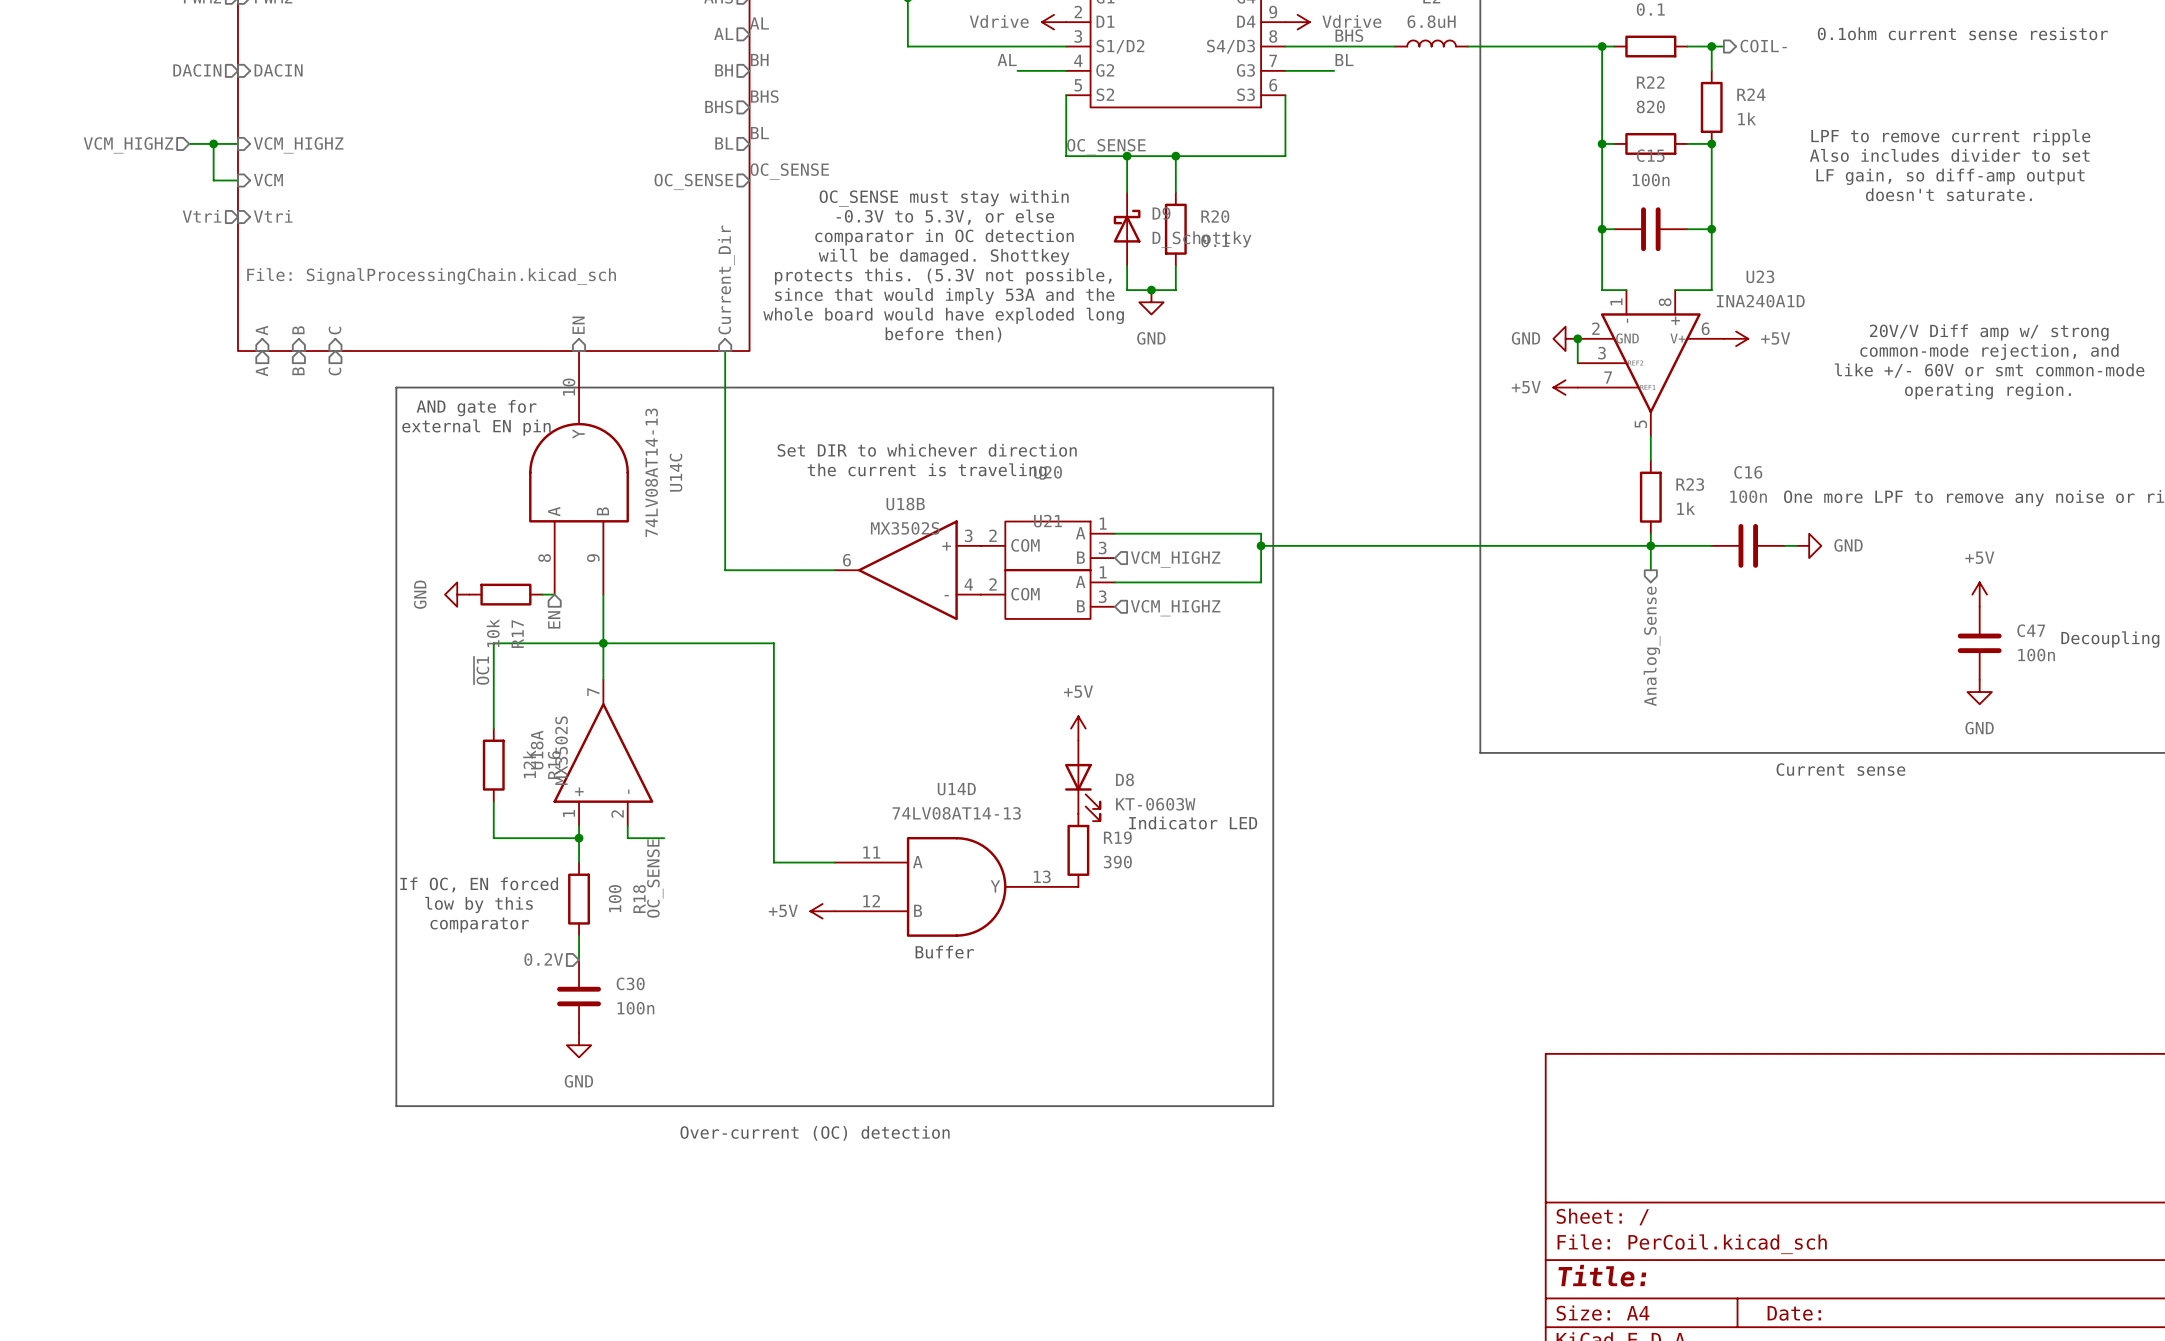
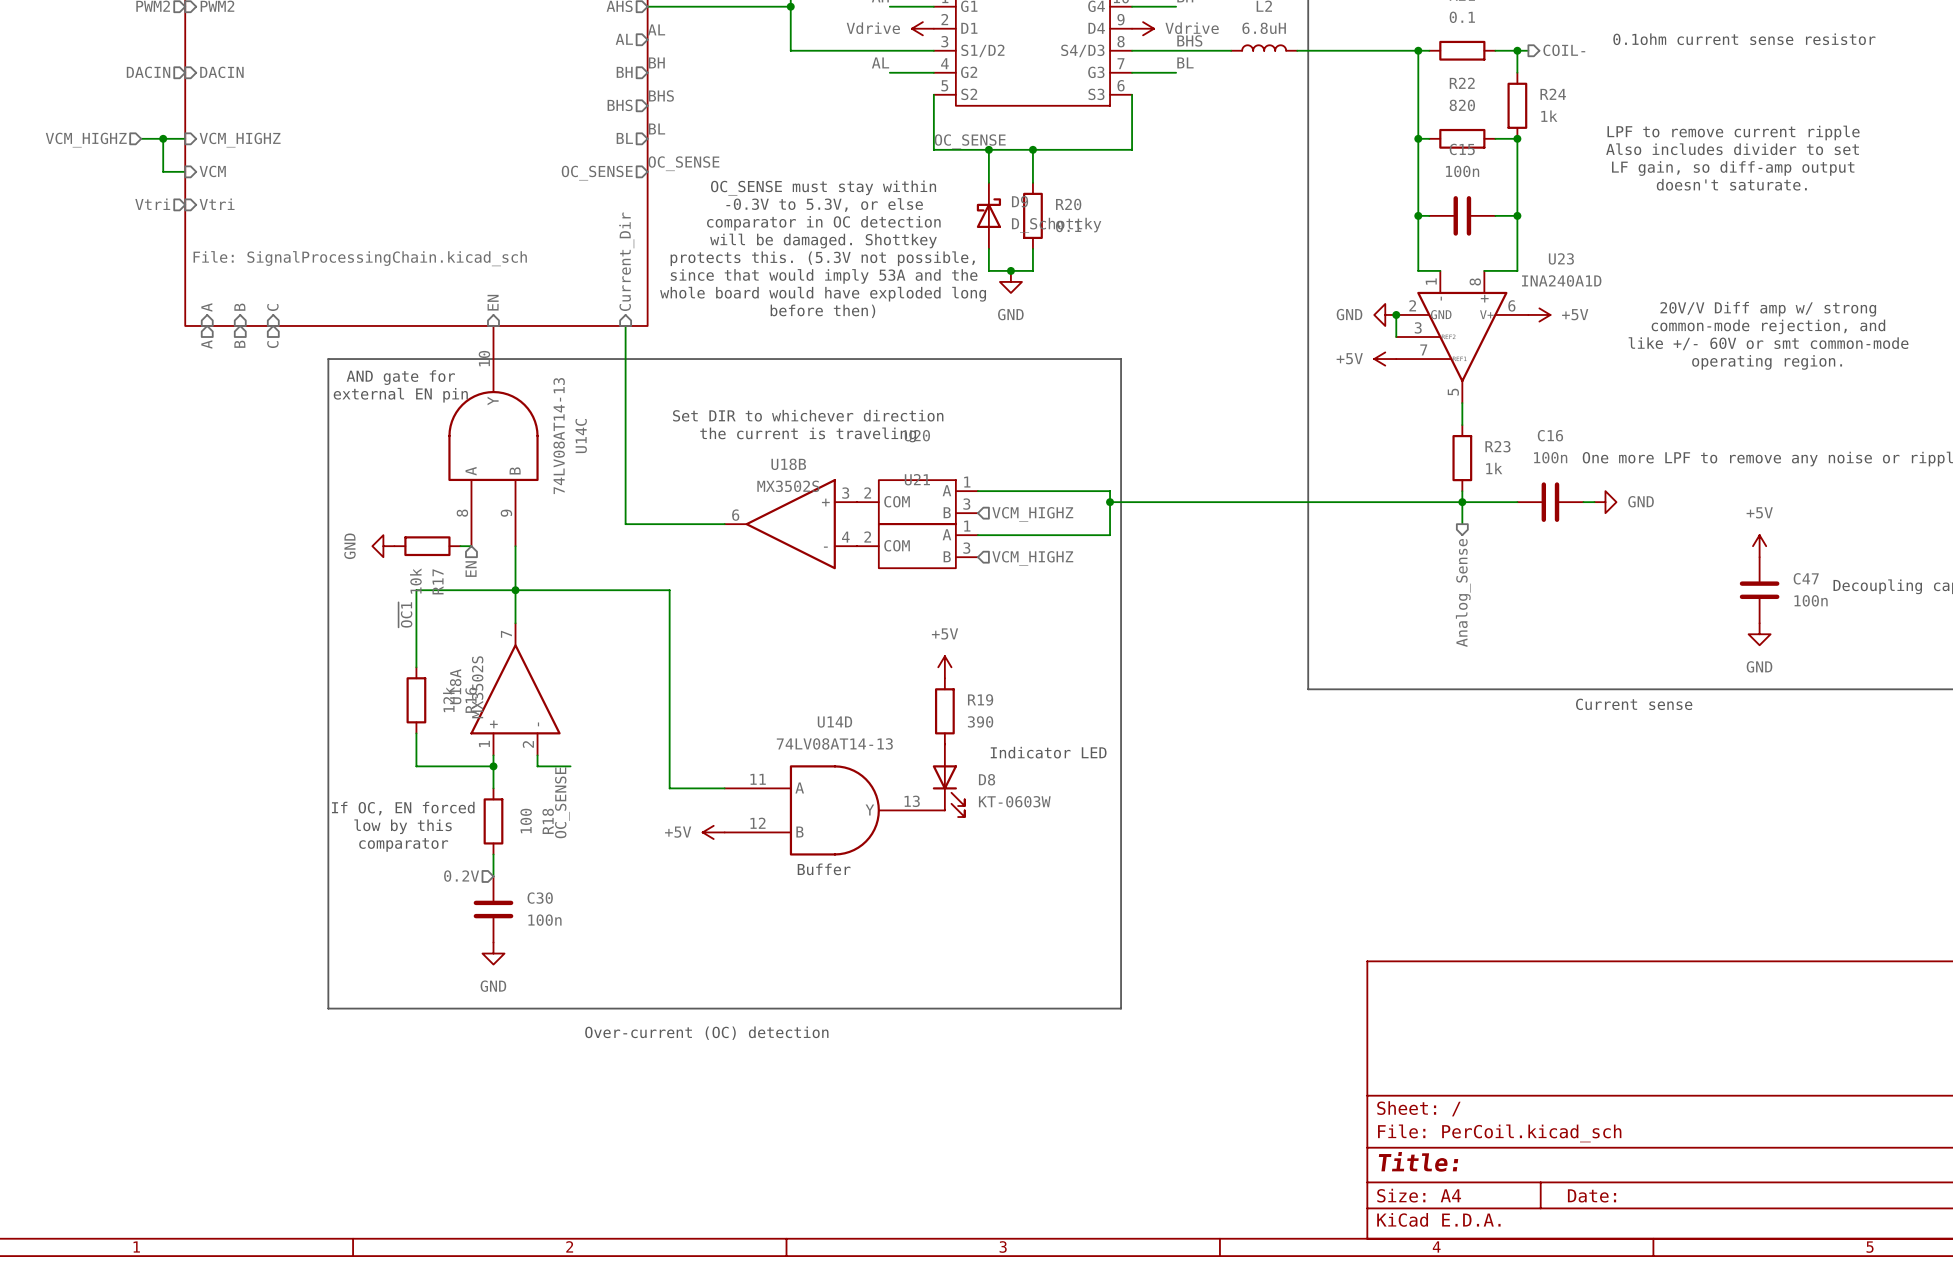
D8 position: (1082, 780) -> (948, 780)
R19 position: (1078, 850) -> (944, 711)

